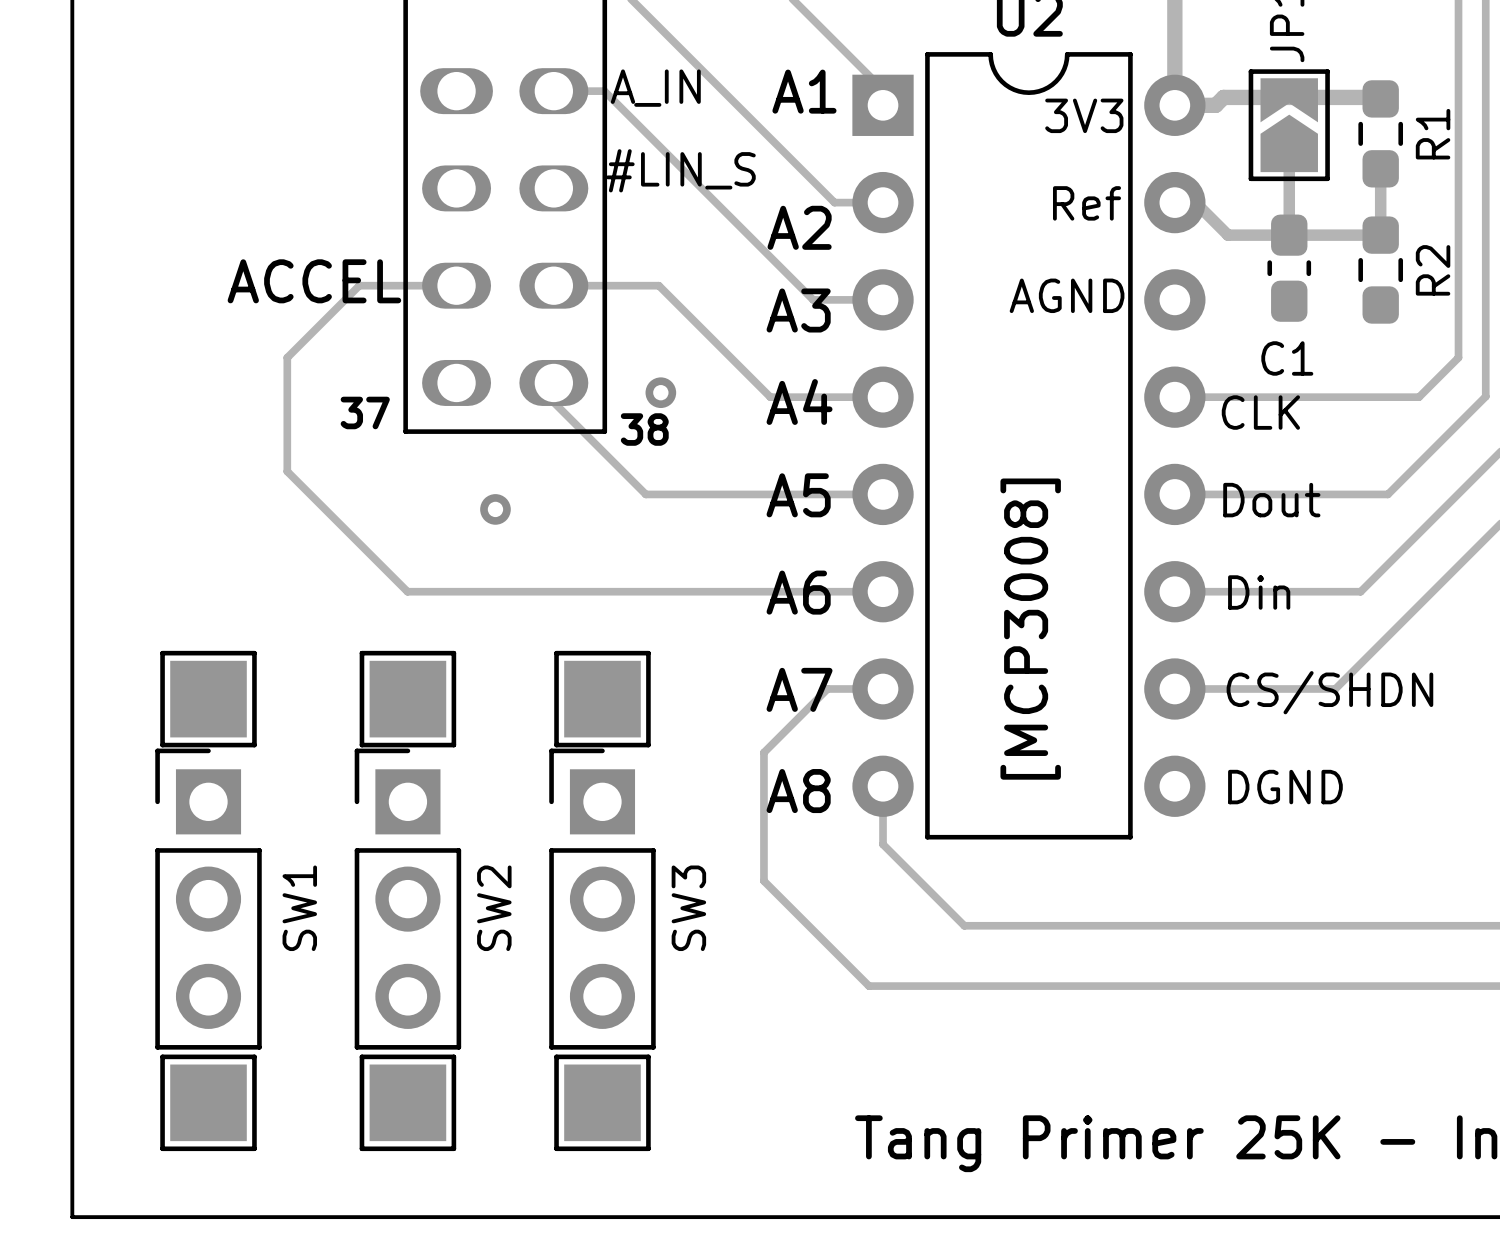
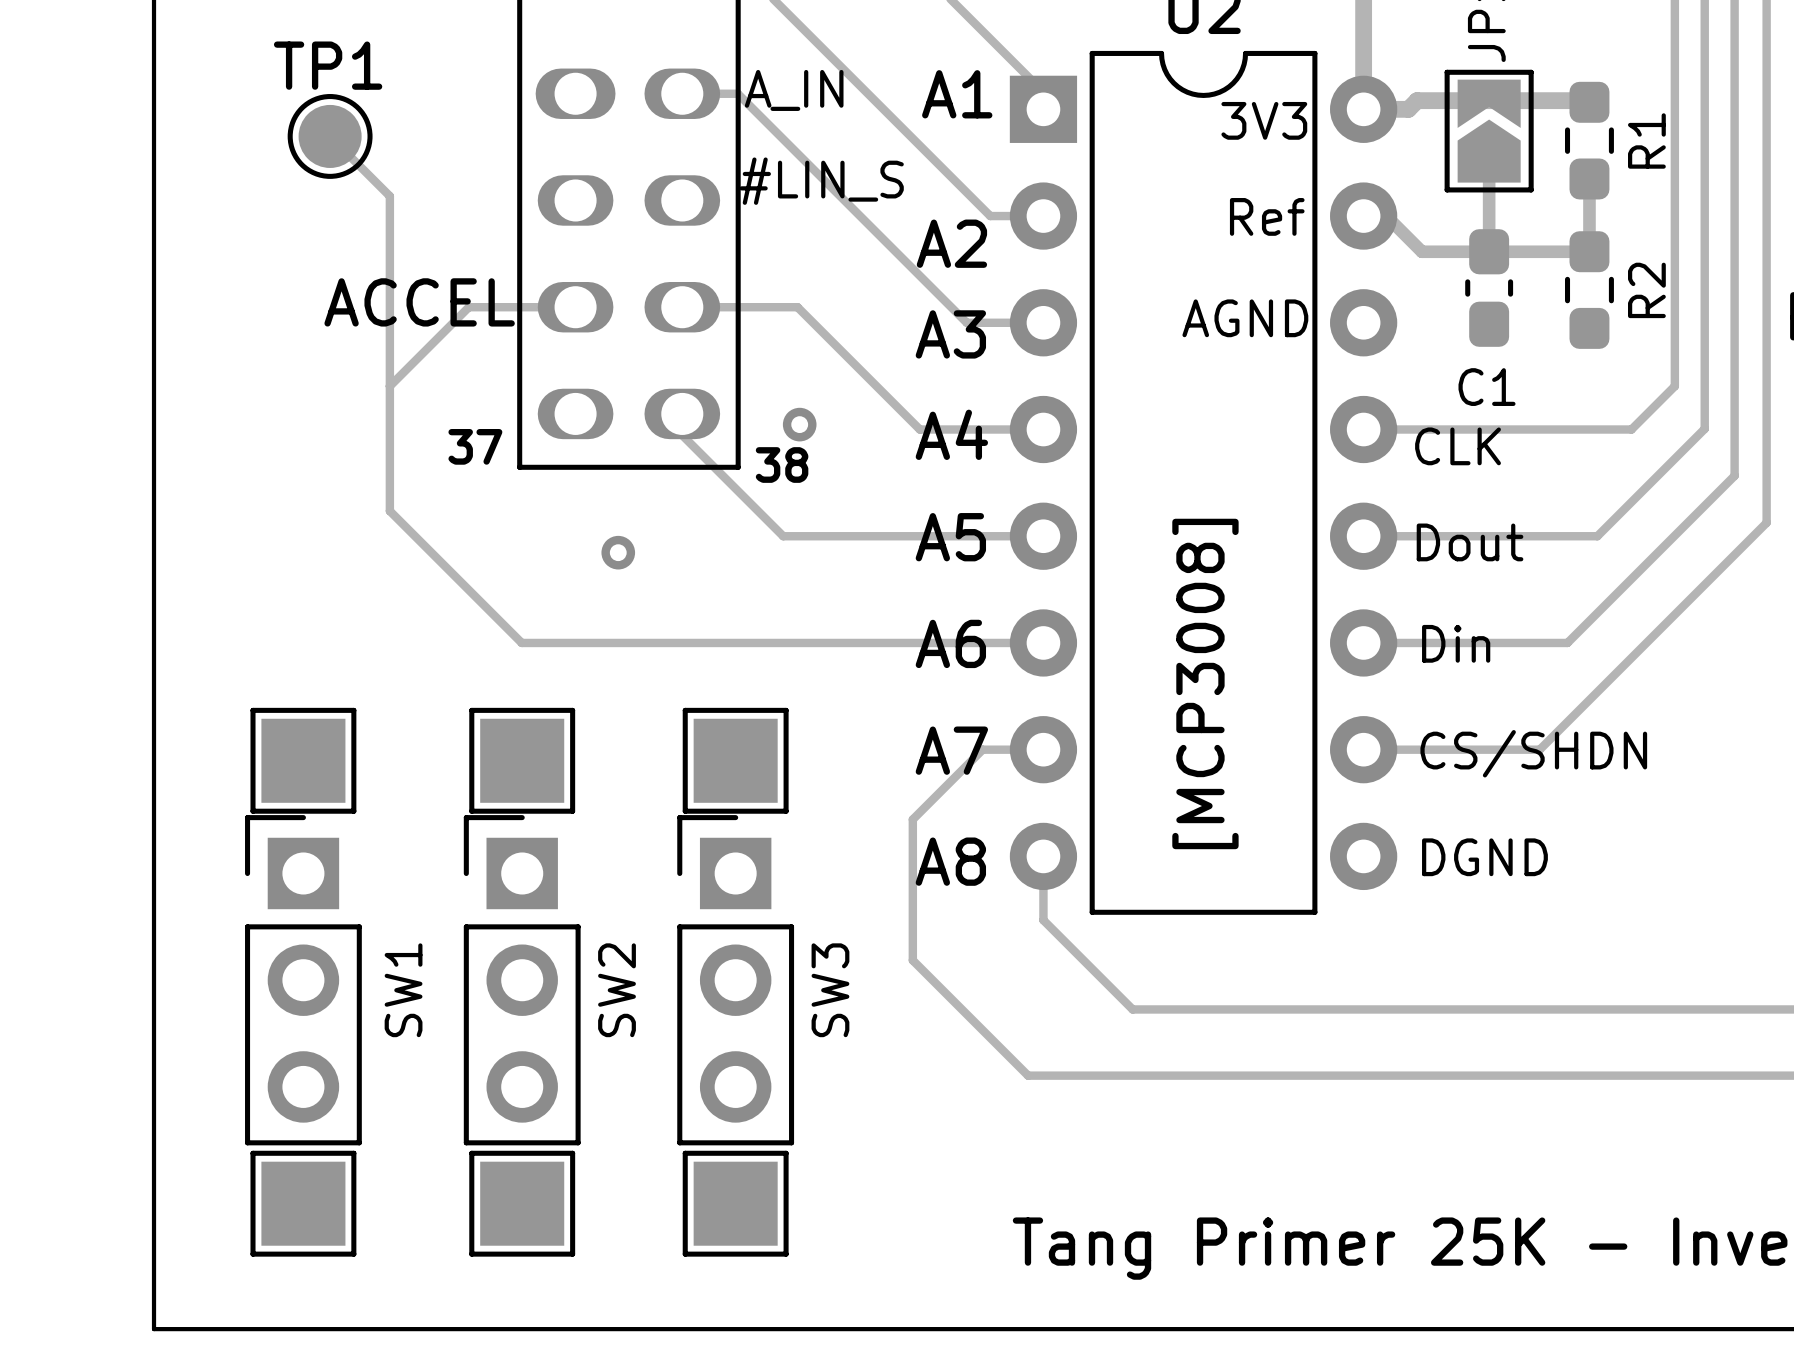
track: none -> (330, 136) (389, 196) (389, 386)
TP1: none -> (330, 136)

